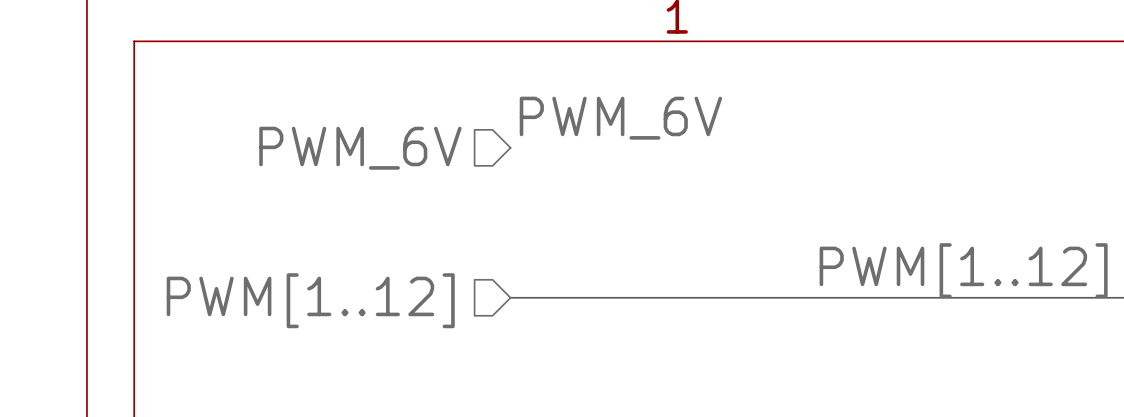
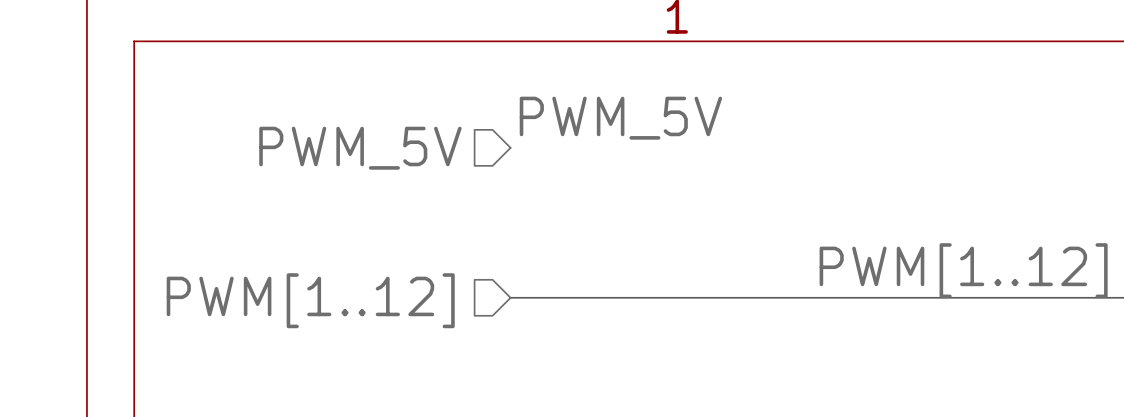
label: PWM_6V (620, 118) -> PWM_5V (620, 118)
hierarchical label: PWM_6V (360, 148) -> PWM_5V (360, 148)

